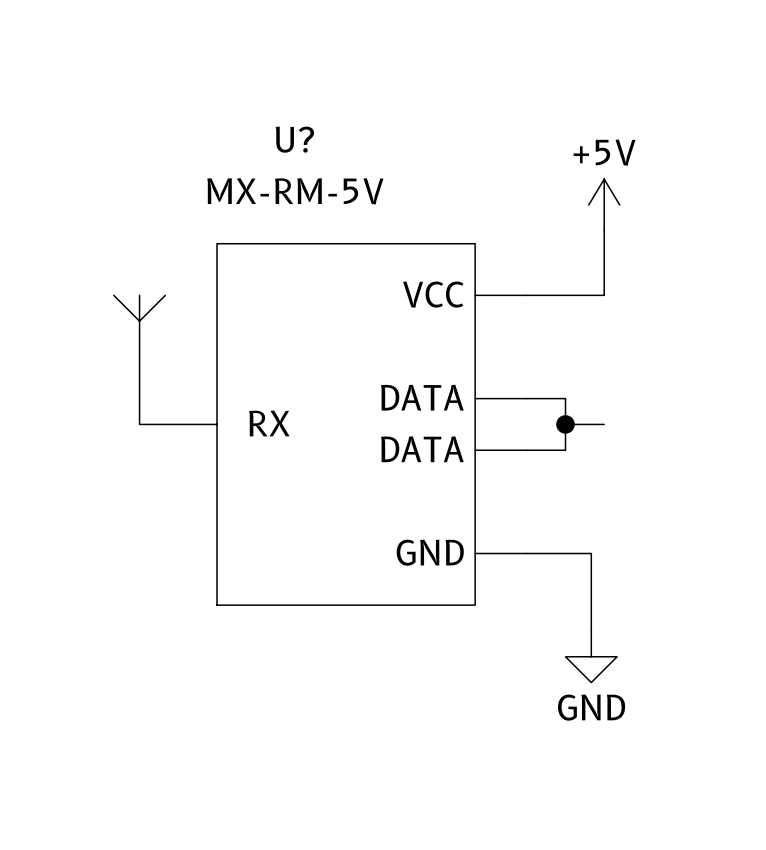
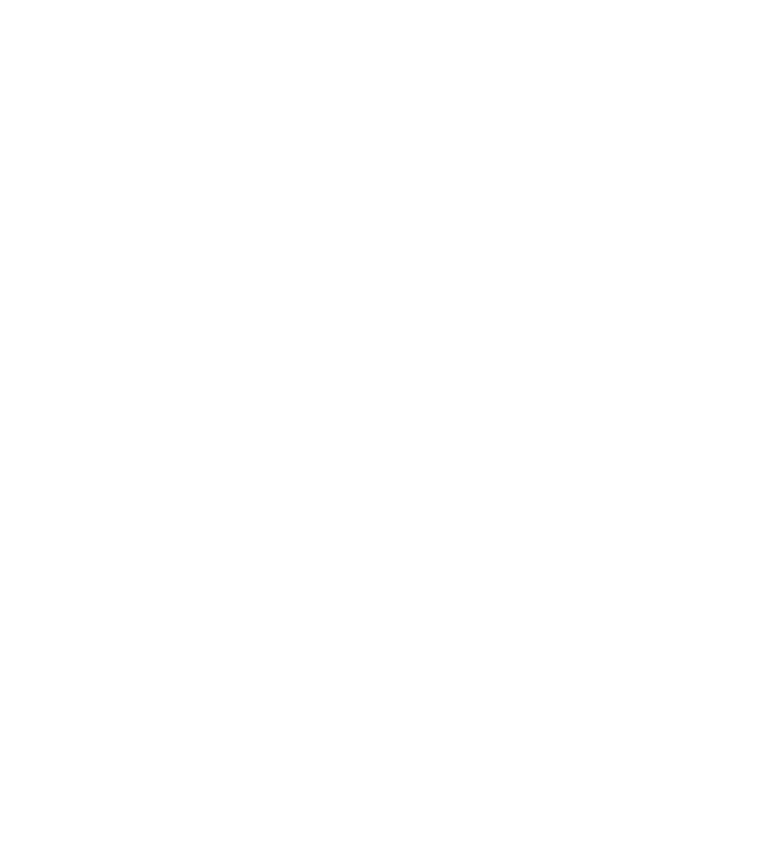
power symbol: +5V (604, 205) -> none
wire: (604, 230) (604, 295) (526, 295) -> none
wire: (526, 398) (565, 398) (565, 450) (526, 450) -> none
U?: MX-RM-5V (320, 424) -> none
wire: (565, 424) (604, 424) -> none
junction: (565, 424) -> none
wire: (526, 553) (591, 553) (591, 630) -> none
power symbol: GND (591, 656) -> none

